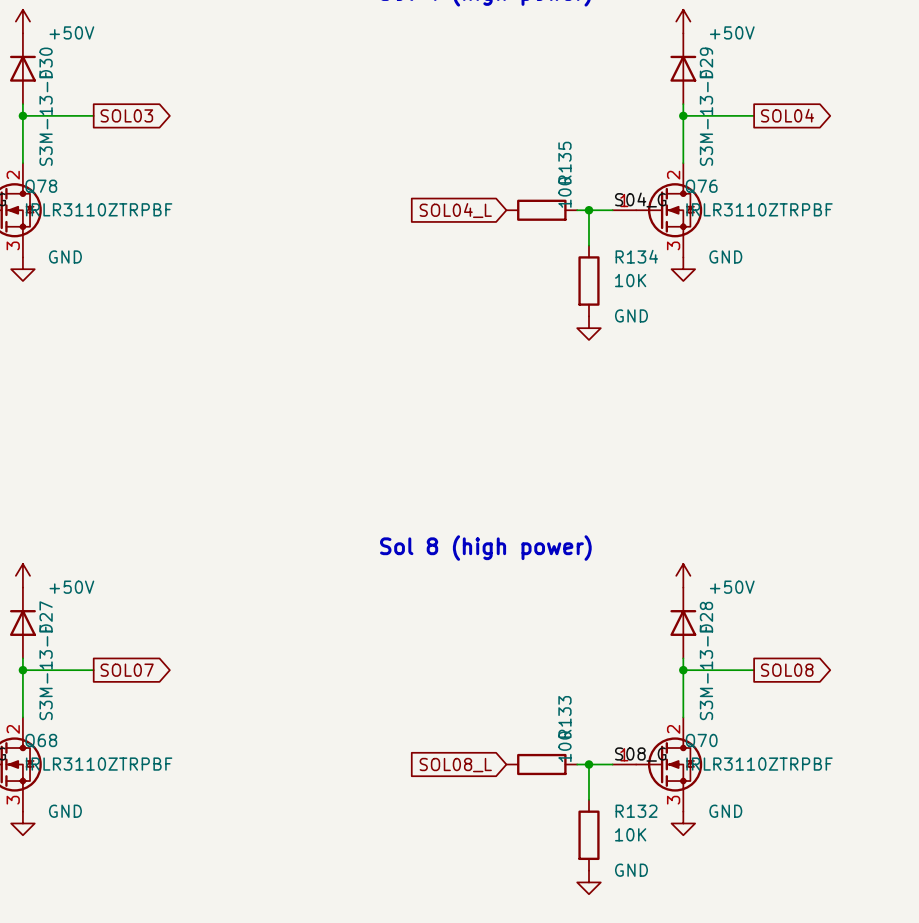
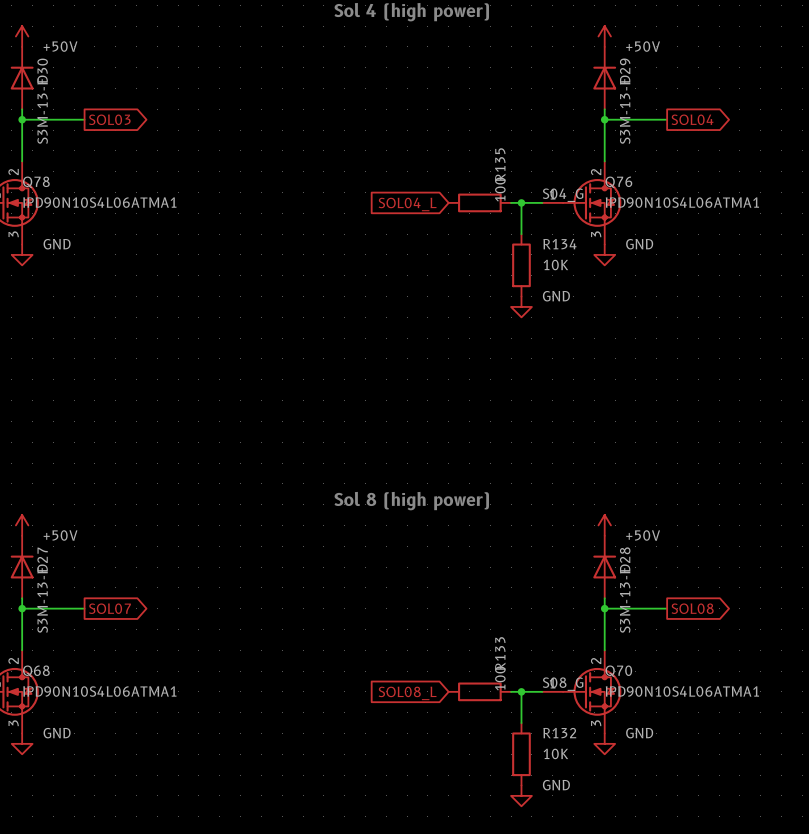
Q78 value: IRLR3110ZTRPBF (99, 209) -> IPD90N10S4L06ATMA1 (99, 202)
Q76 value: IRLR3110ZTRPBF (759, 209) -> IPD90N10S4L06ATMA1 (682, 202)
Q68 value: IRLR3110ZTRPBF (99, 764) -> IPD90N10S4L06ATMA1 (99, 691)
Q70 value: IRLR3110ZTRPBF (759, 764) -> IPD90N10S4L06ATMA1 (682, 691)

